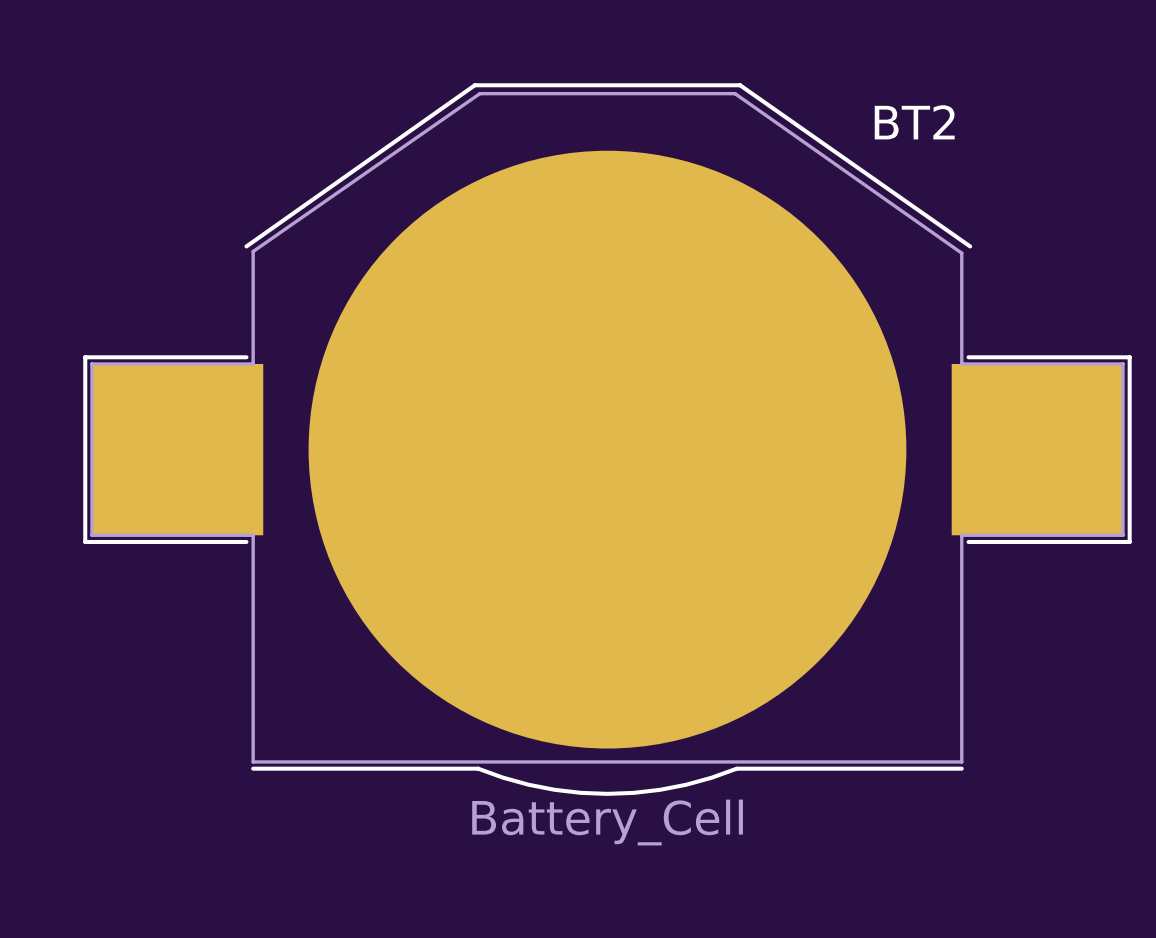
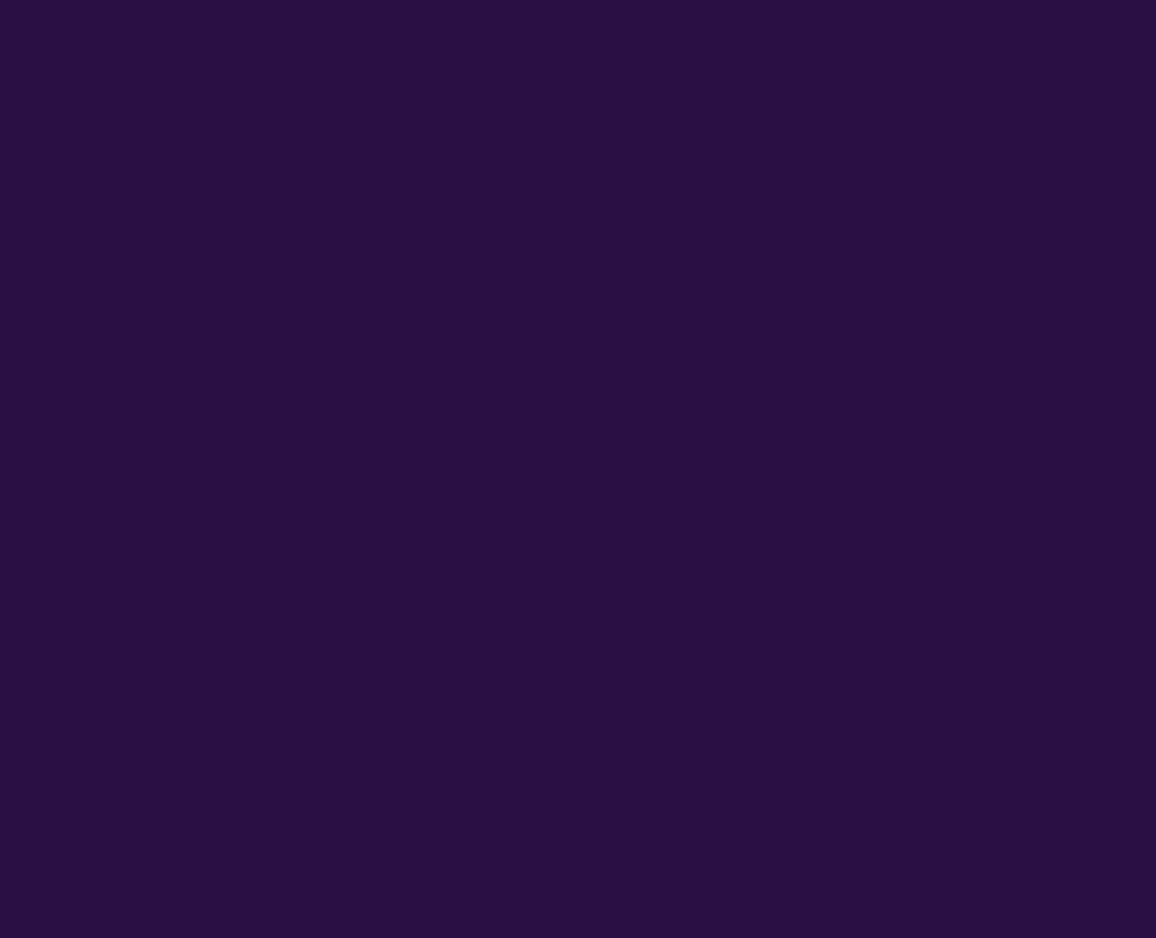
BT2: Battery_Cell (607, 439) -> none

